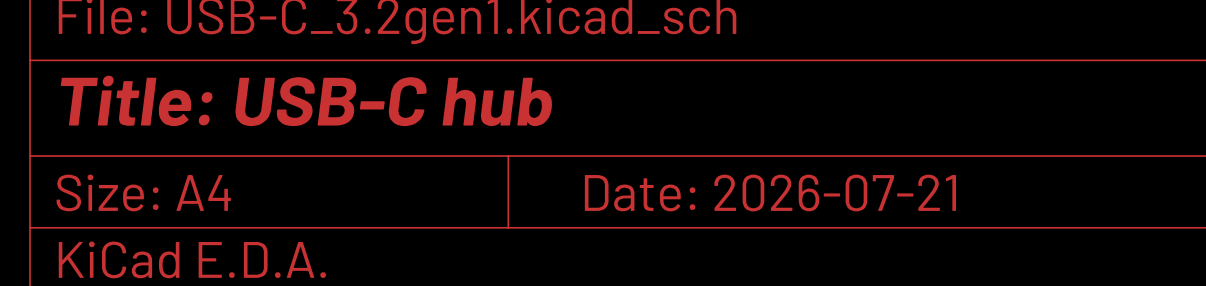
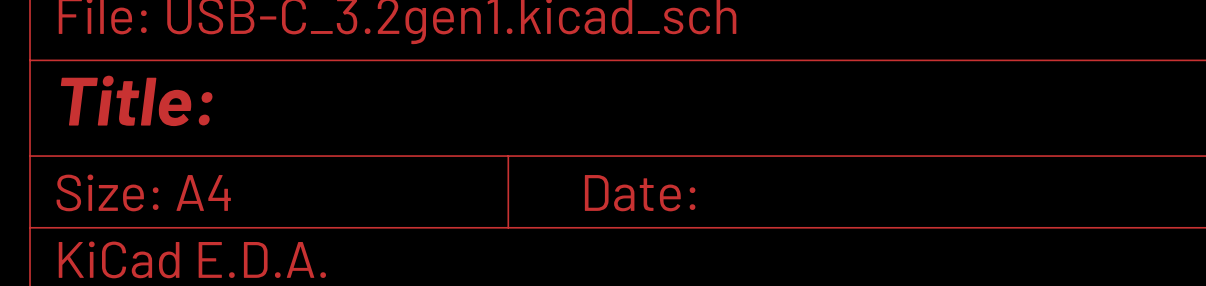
title block: Title: USB-C hub (306, 100) -> Title: (136, 100)
title block: Date: 2026-07-21 (770, 192) -> Date: (640, 193)

